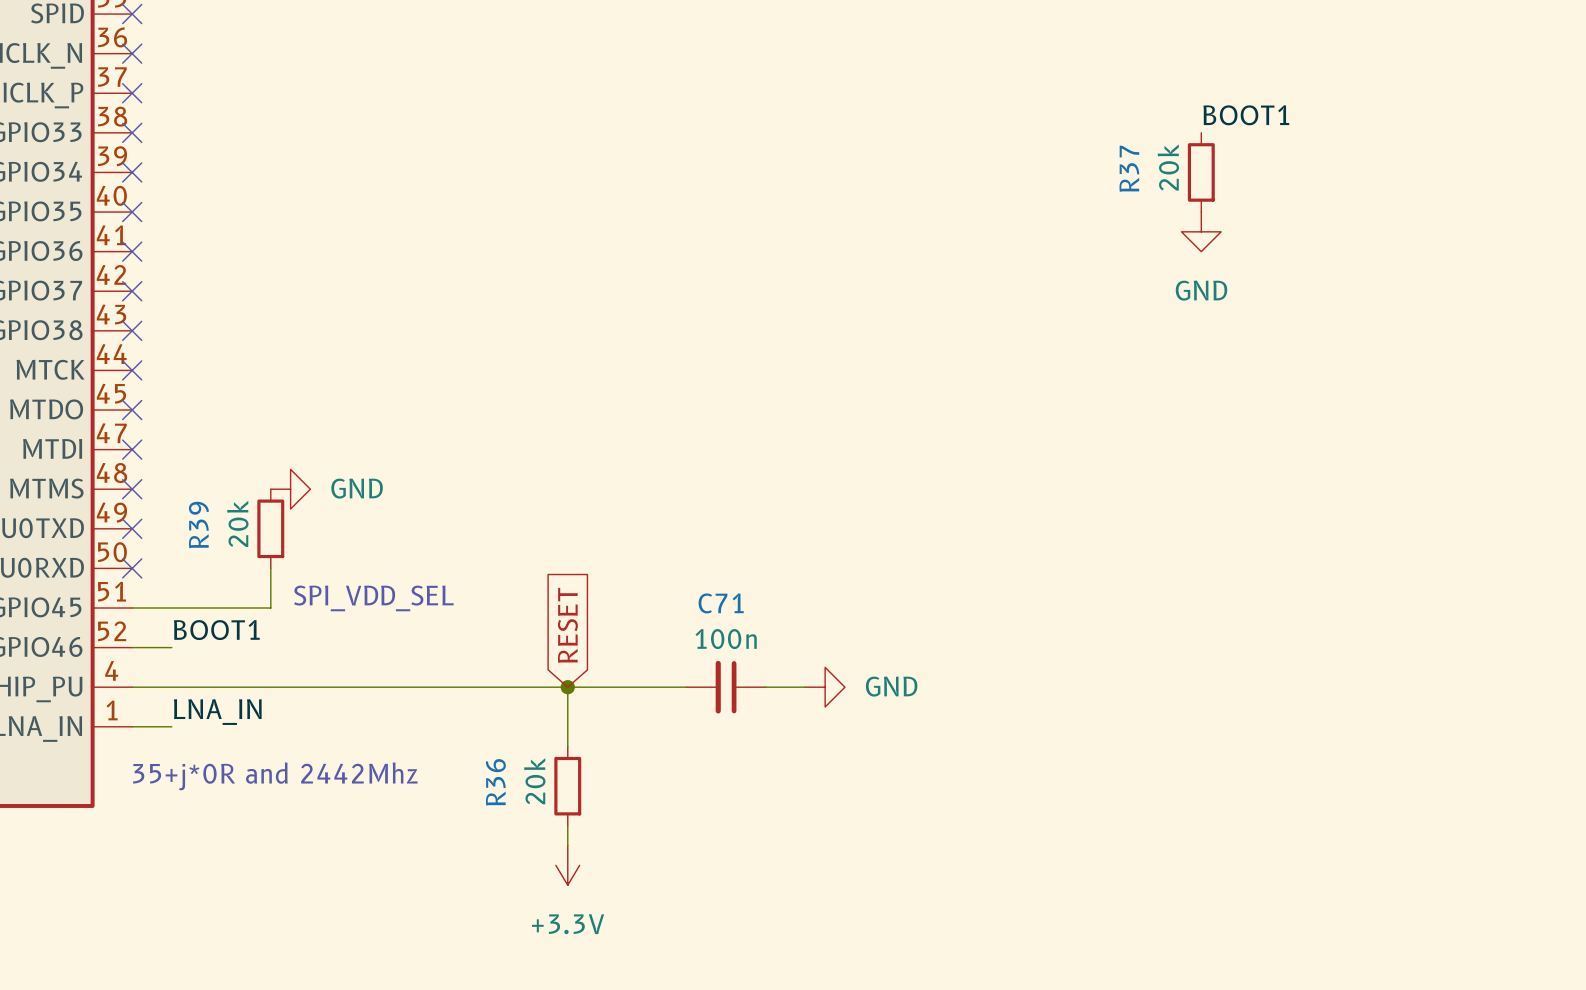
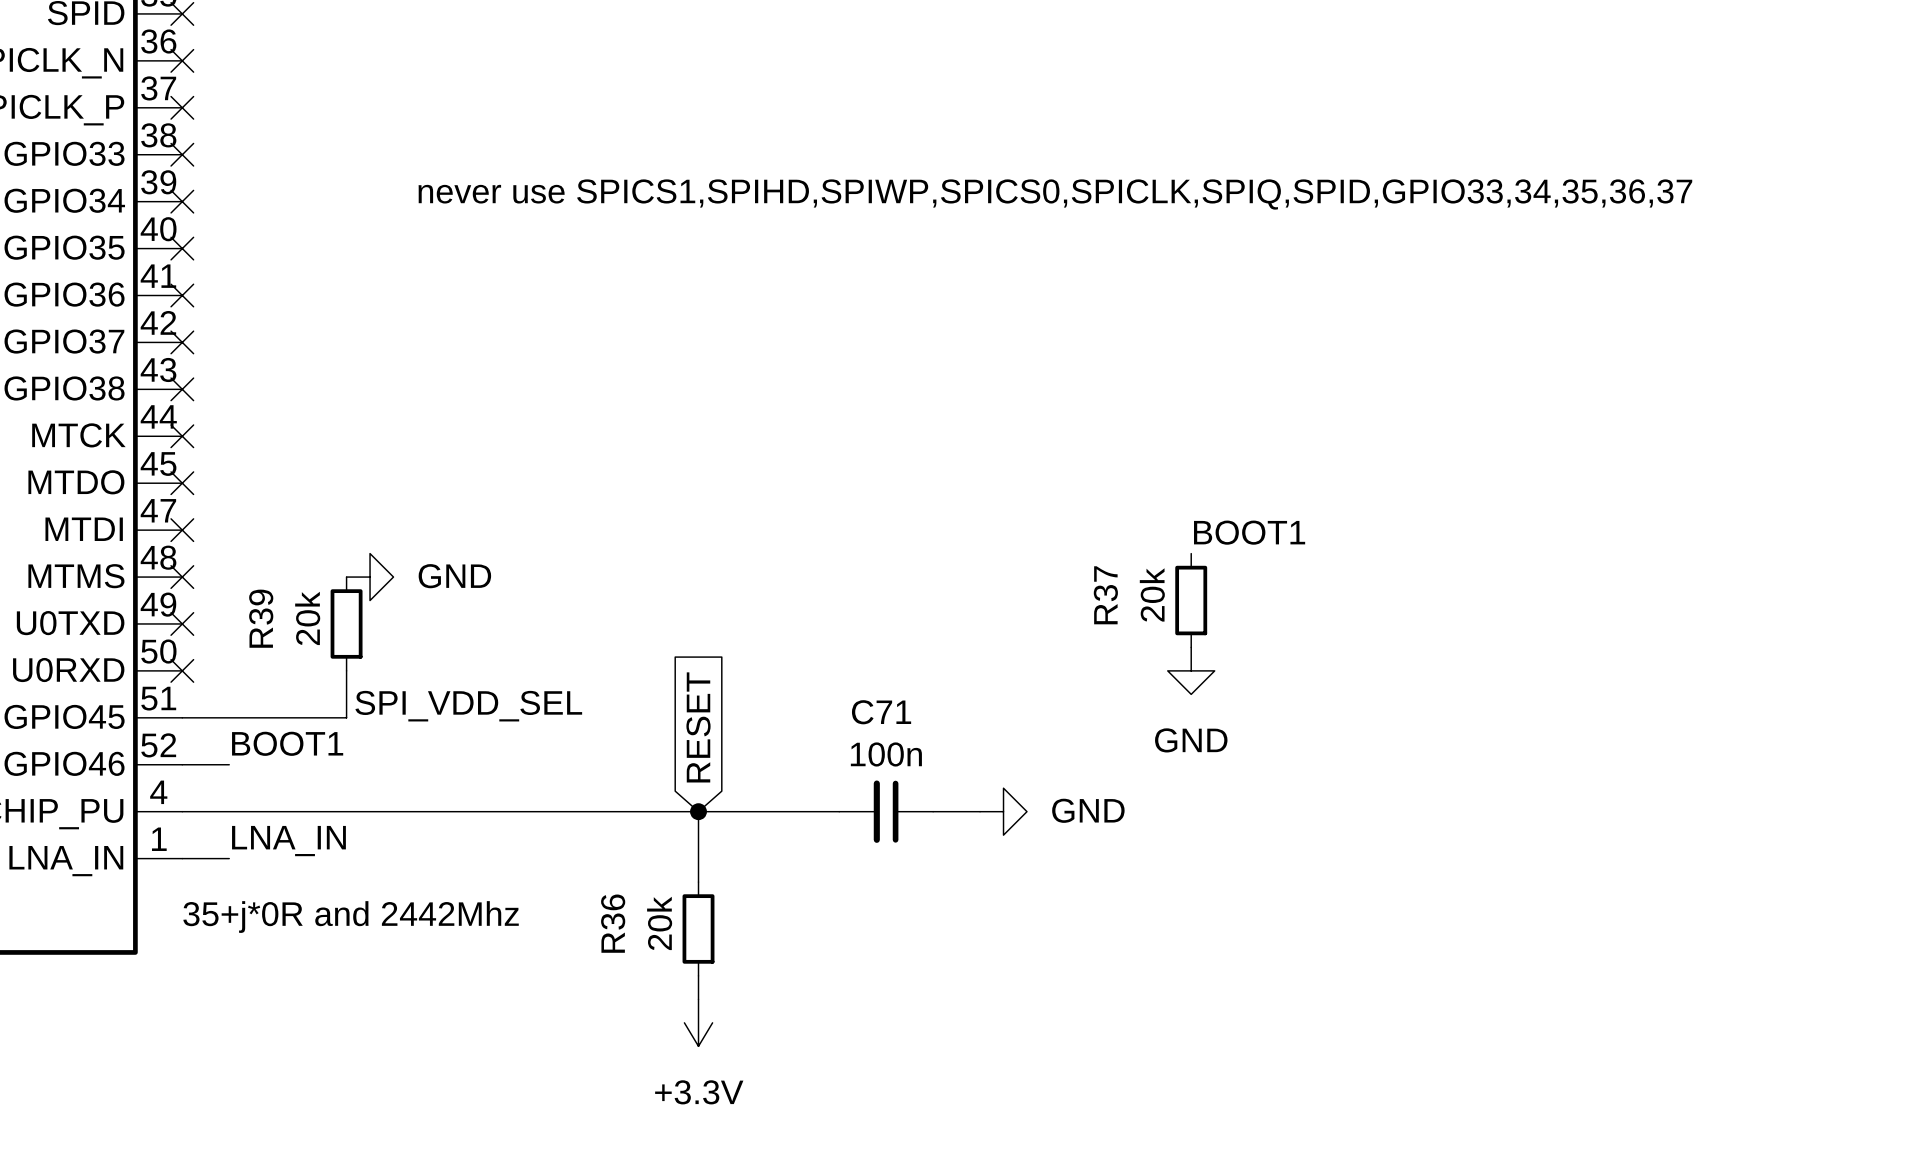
label: BOOT1 (1246, 115) -> none
text: none -> never use SPICS1,SPIHD,SPIWP,SPICS0,SPICLK,SPIQ,SPID,GPIO33,34,35,36,37 (1055, 194)
R37 position: (1201, 172) -> (1191, 600)
power symbol: GND (1201, 231) -> none
label: none -> BOOT1 (1249, 532)
power symbol: none -> GND (1191, 670)

